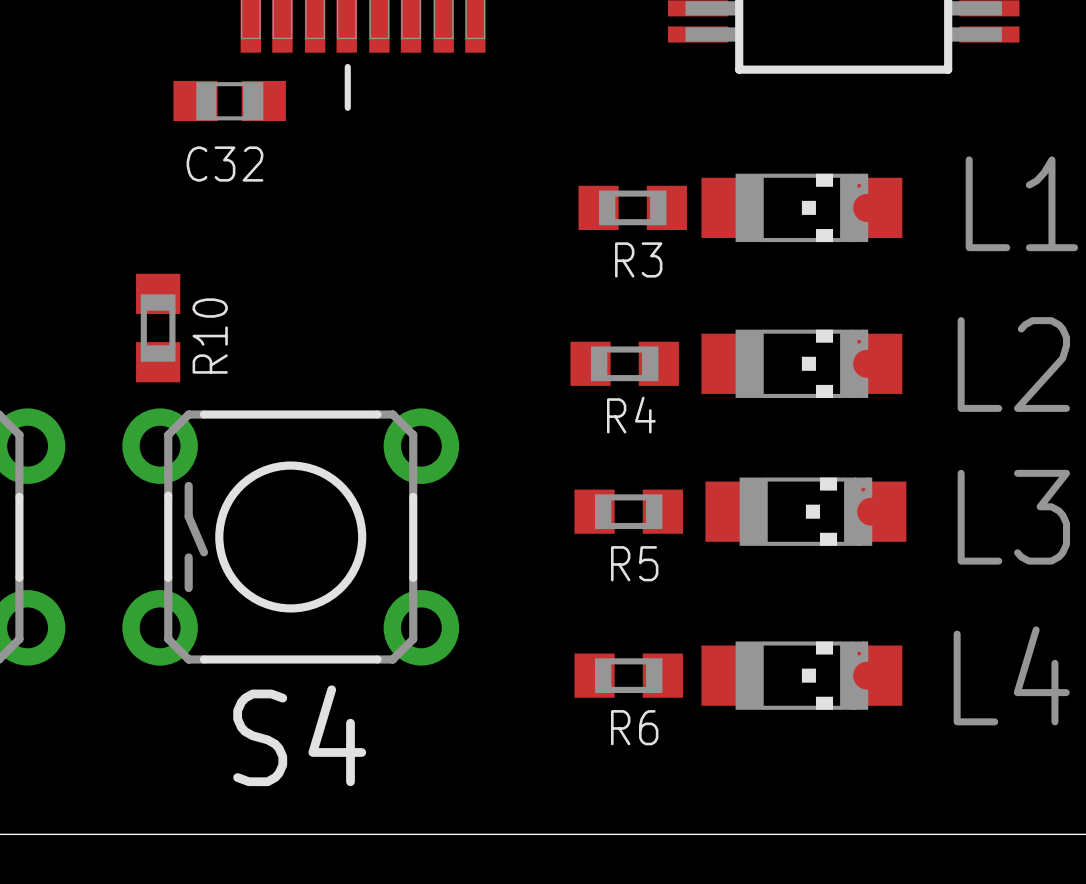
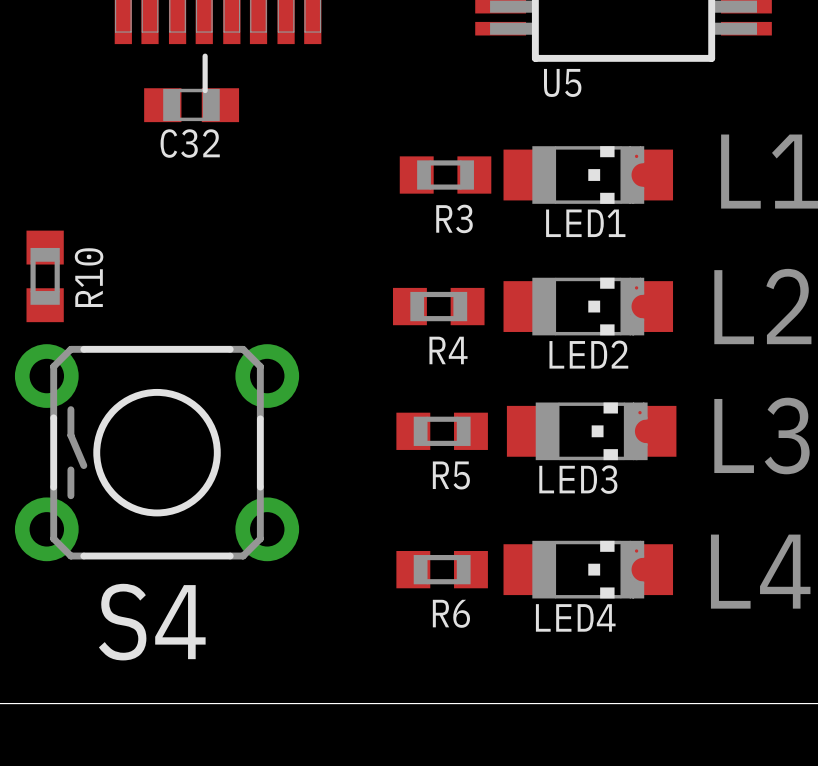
U5 name: none -> U5 (562, 82)
C32 position: (229, 101) -> (191, 105)
C32 name position: C32 (225, 164) -> C32 (190, 143)
LED1 name: none -> LED1 (585, 223)
LED2 name: none -> LED2 (588, 354)
LED3 name: none -> LED3 (578, 479)
LED4 name: none -> LED4 (575, 617)

